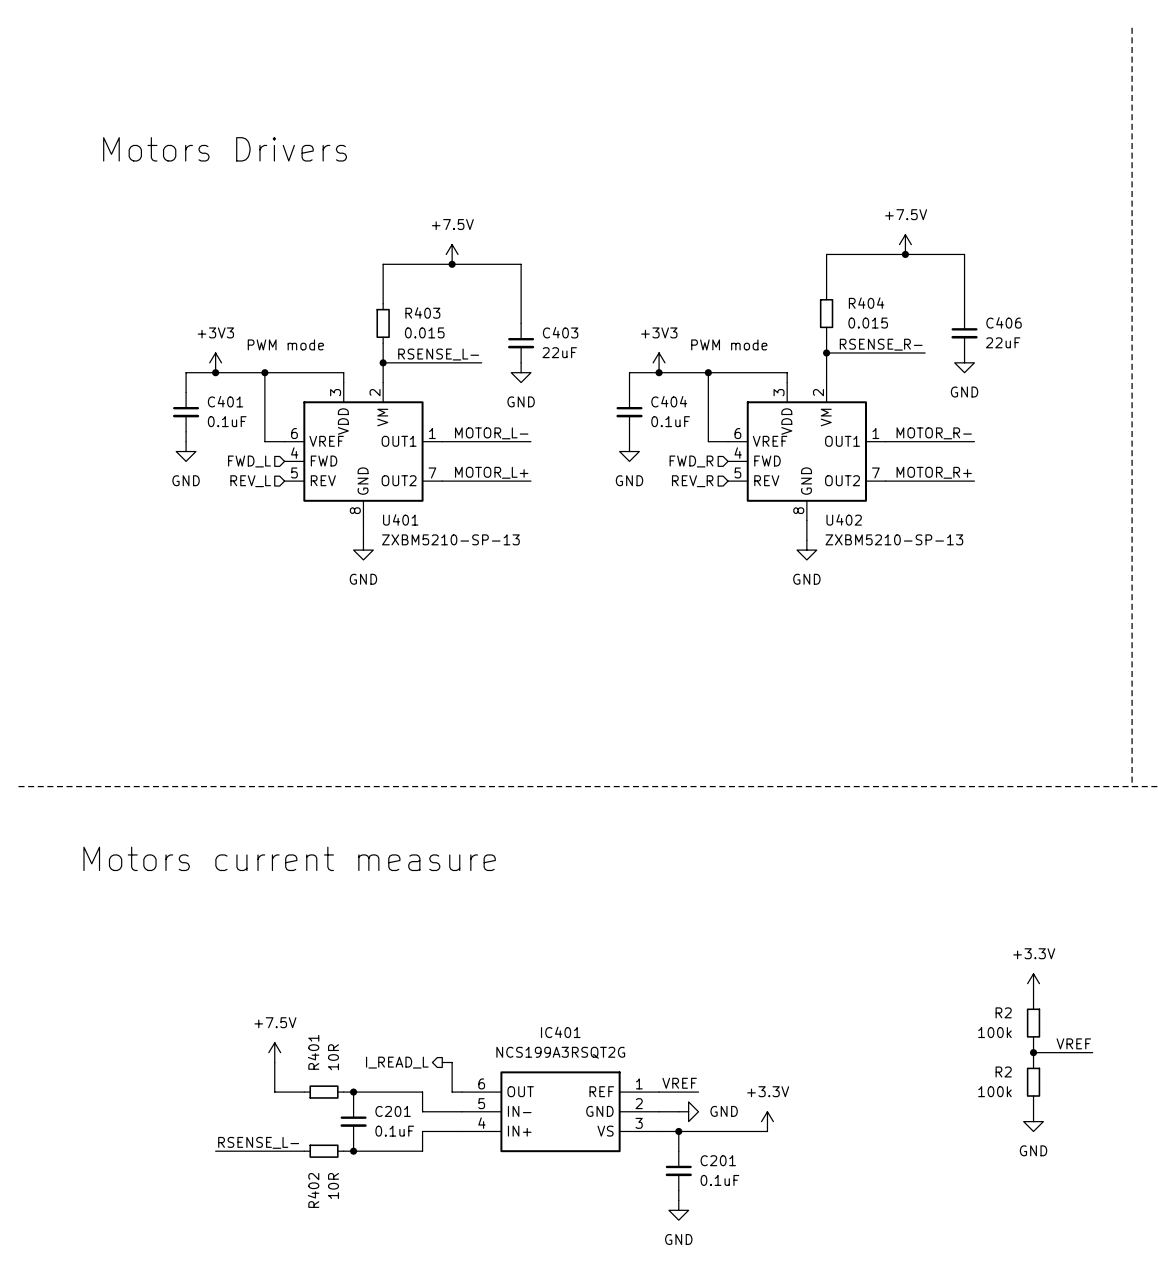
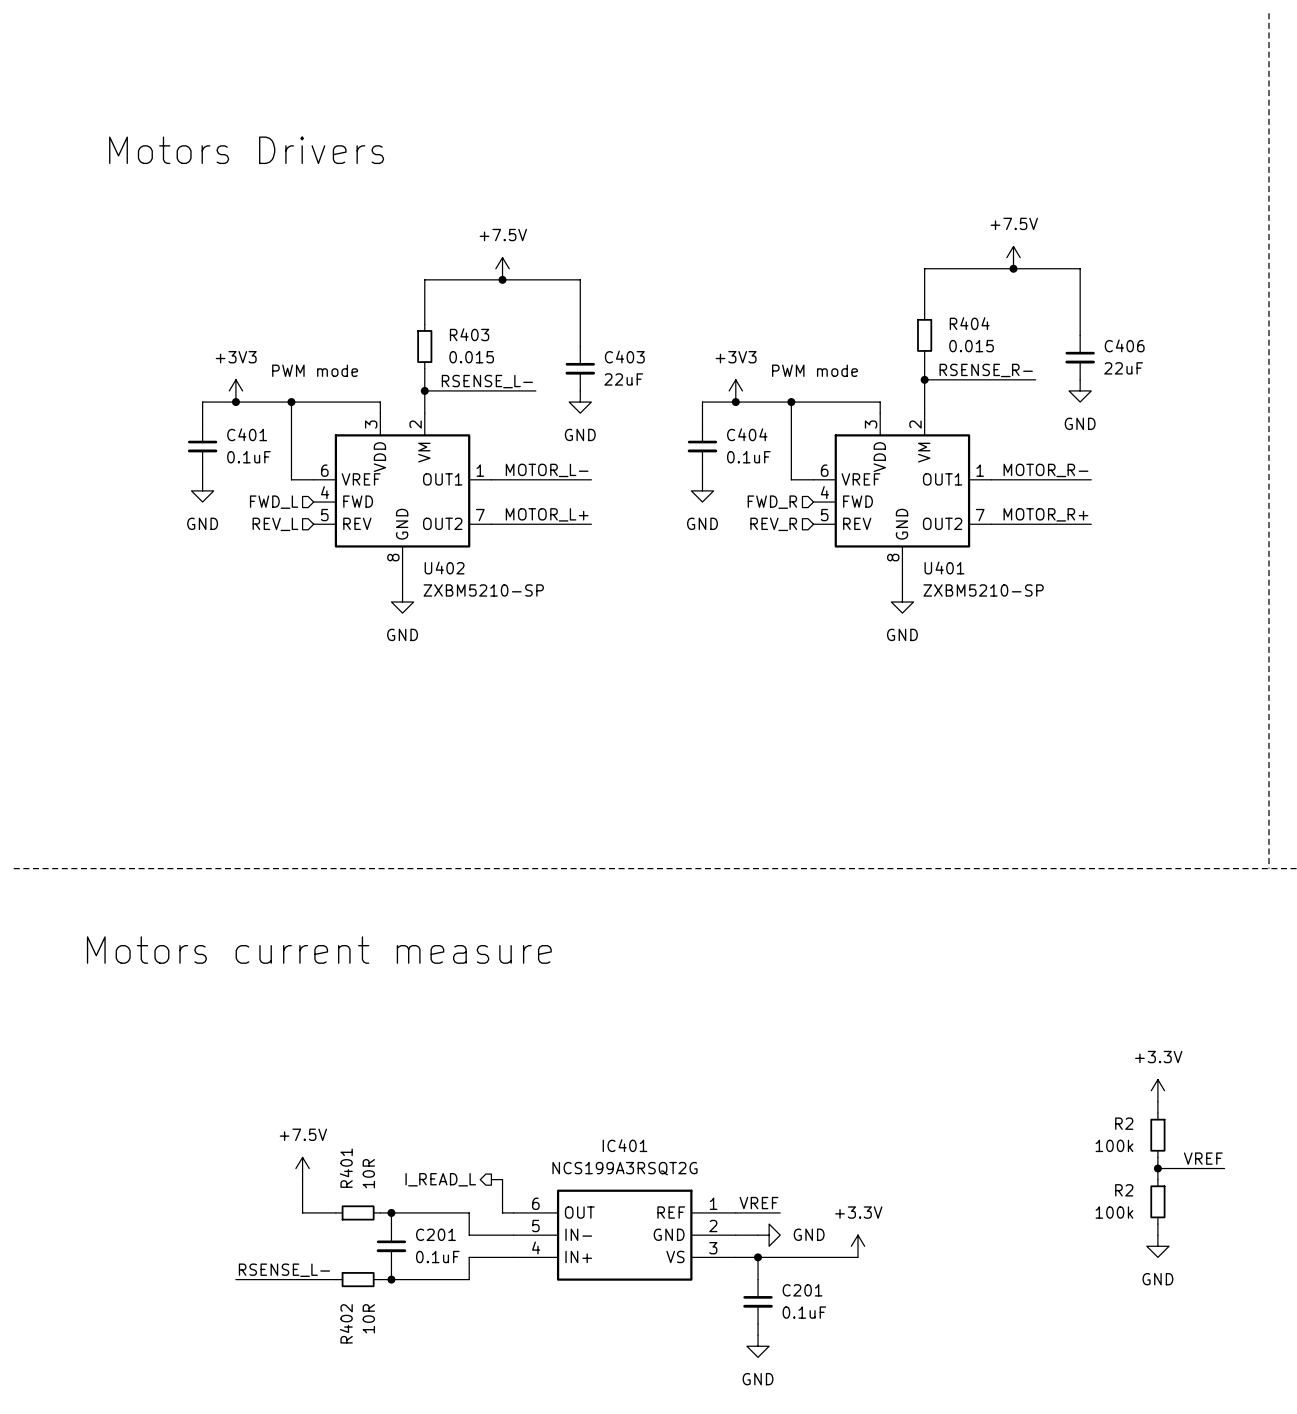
U401 name: U401 (400, 519) -> U402 (444, 567)
U402 name: U402 (844, 519) -> U401 (944, 567)
U401 value: ZXBM5210-SP-13 (450, 539) -> ZXBM5210-SP (483, 590)
U402 value: ZXBM5210-SP-13 (894, 539) -> ZXBM5210-SP (983, 590)

